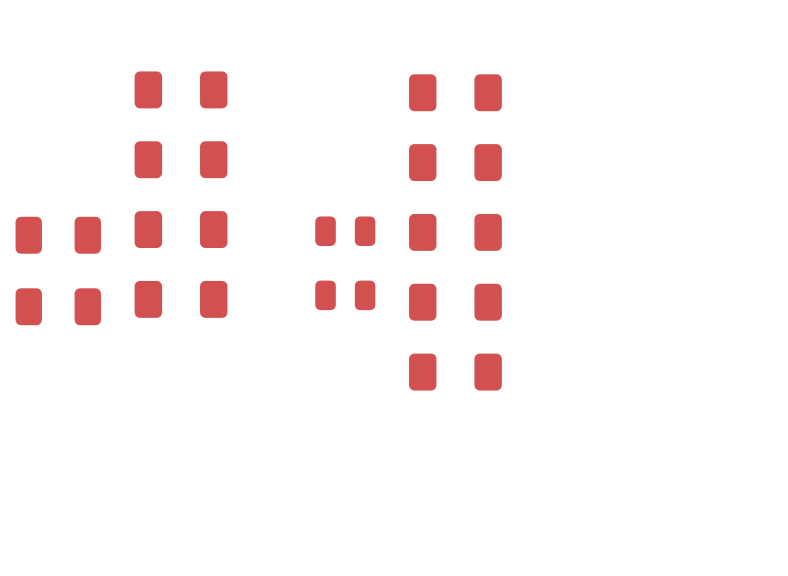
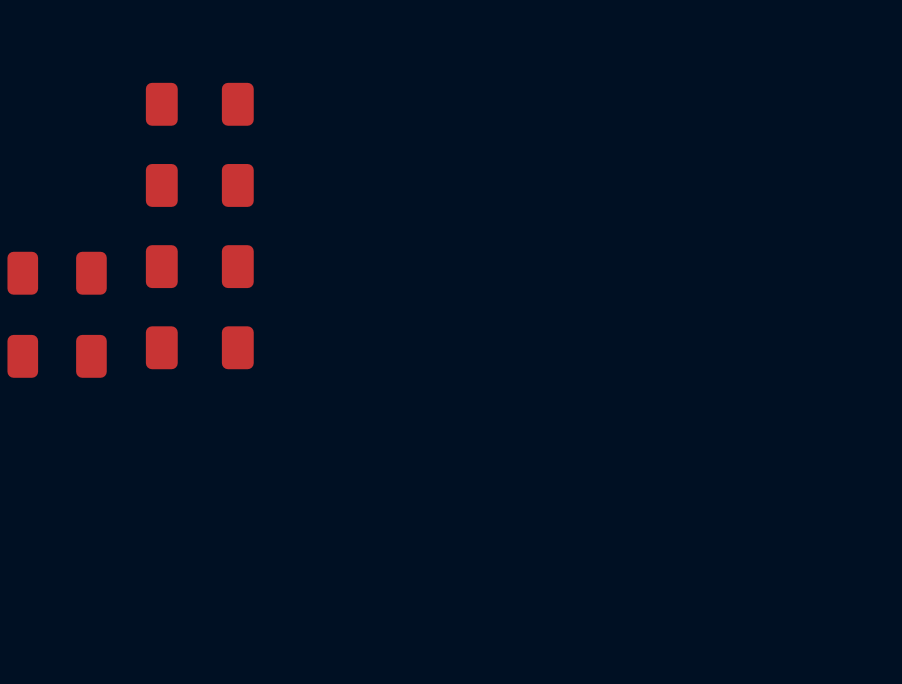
part: (455, 92) -> none
part: (455, 162) -> none
part: (345, 231) -> none
part: (455, 232) -> none
part: (345, 295) -> none
part: (455, 302) -> none
part: (455, 372) -> none

